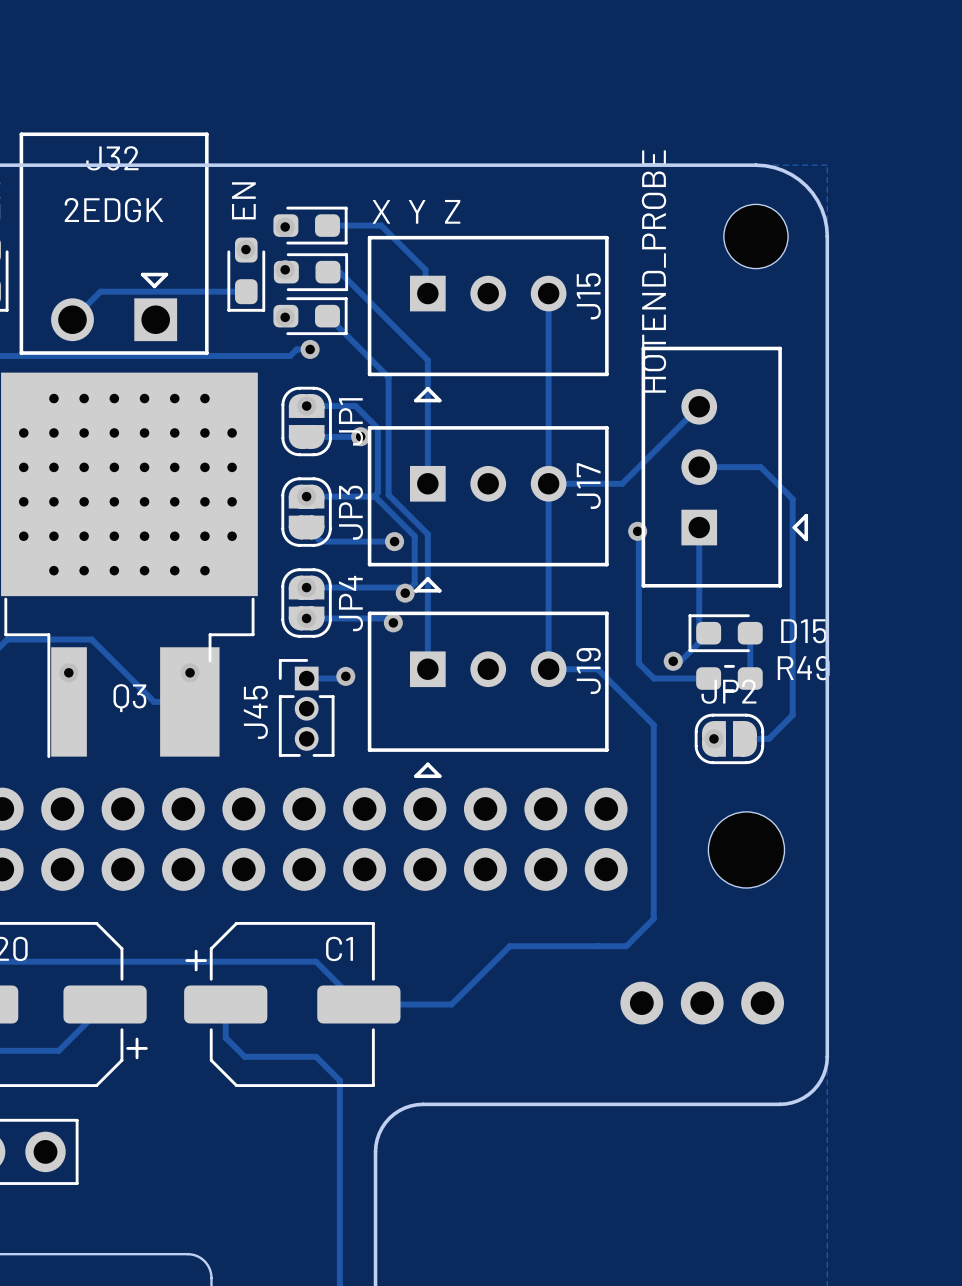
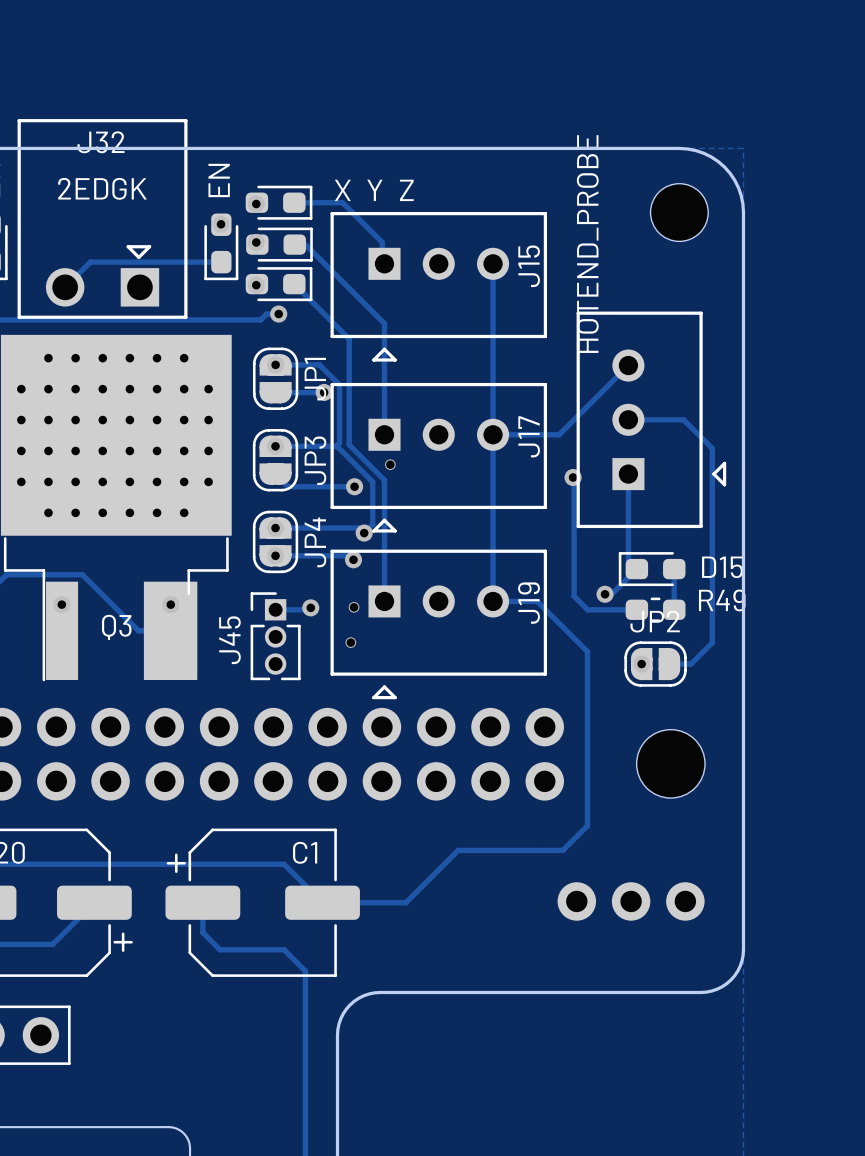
via: none -> (390, 464)
via: none -> (354, 607)
via: none -> (350, 642)

